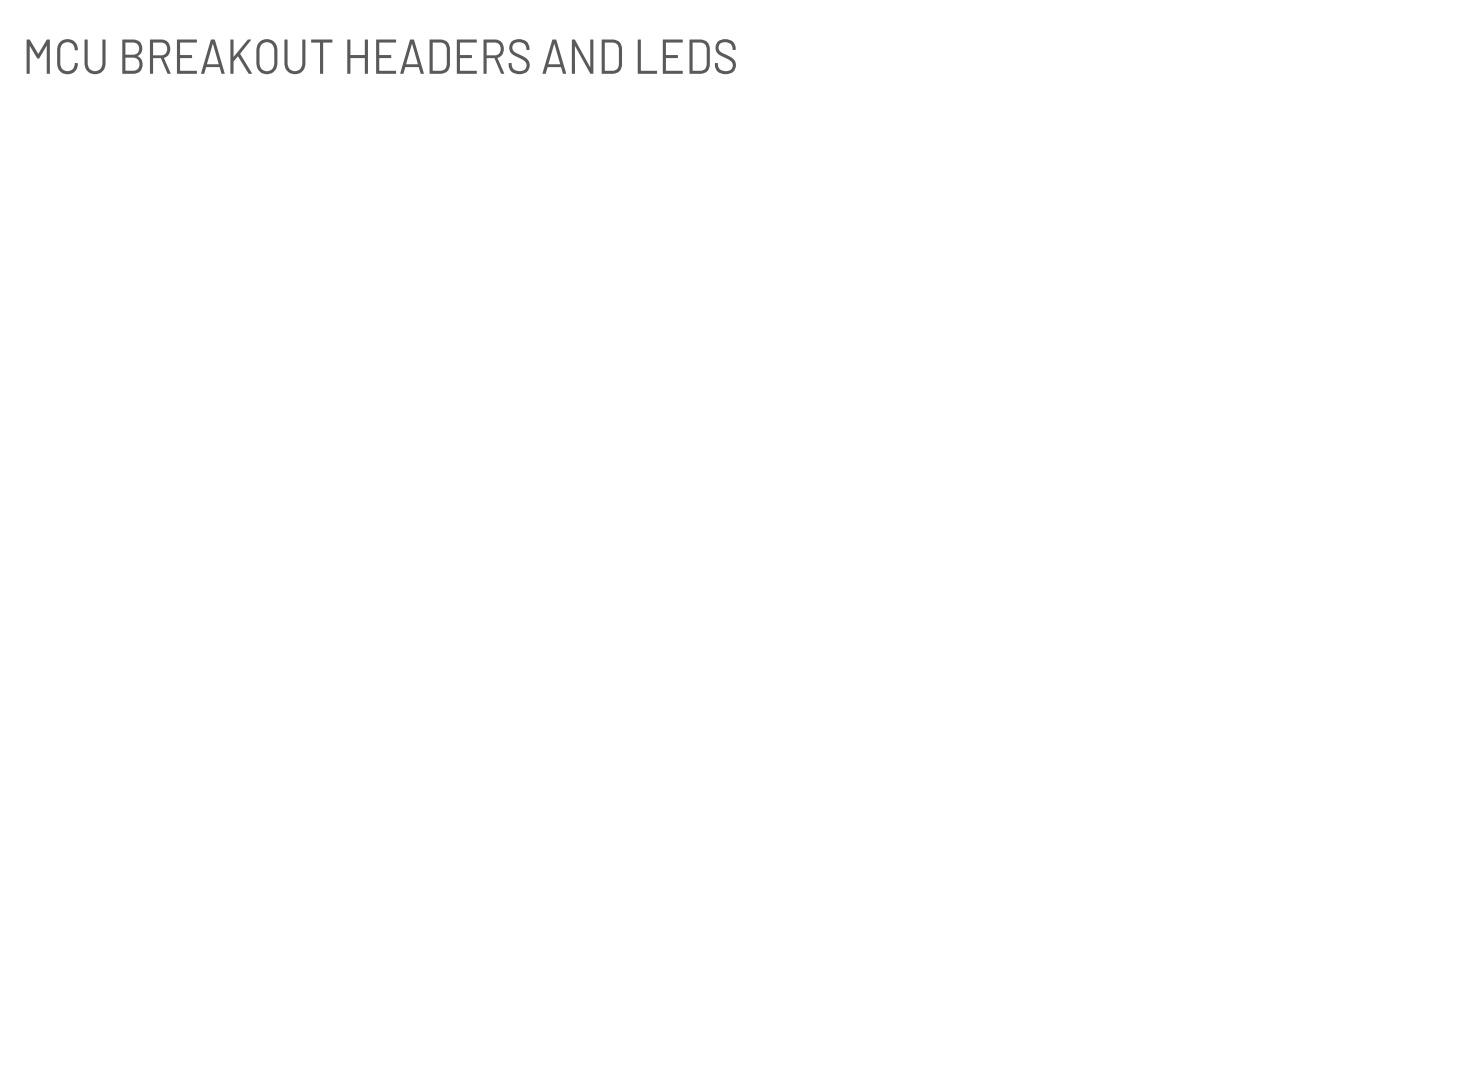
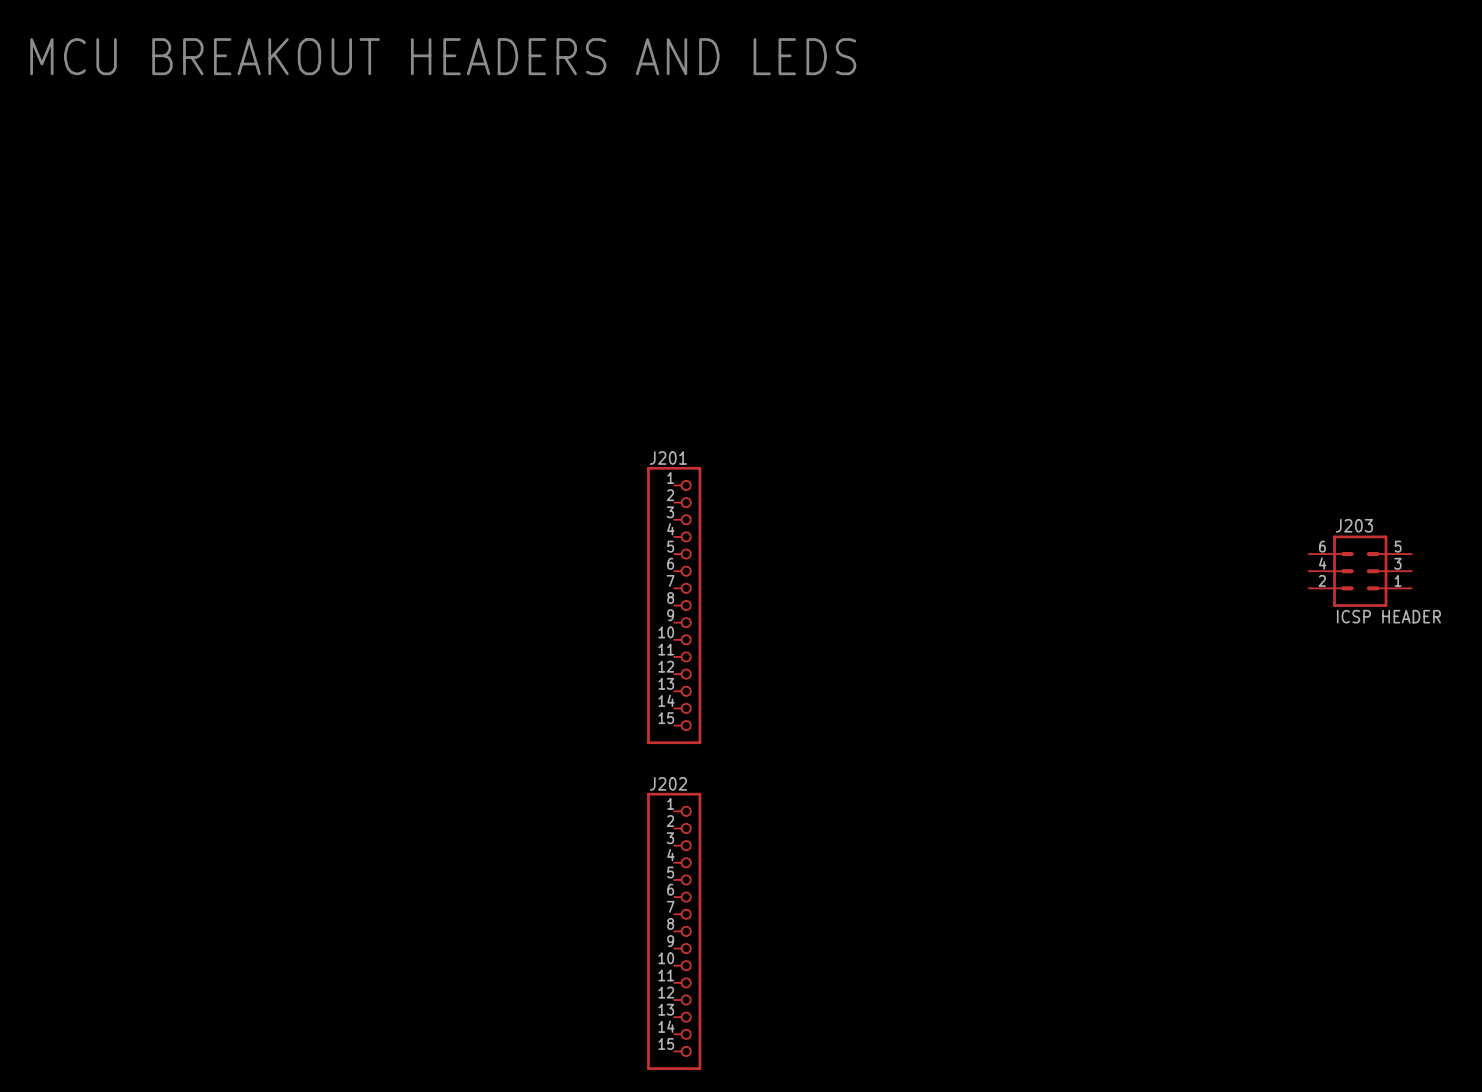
J203: none -> ICSP HEADER (1360, 571)
J201: none -> (674, 605)
J202: none -> (674, 931)

